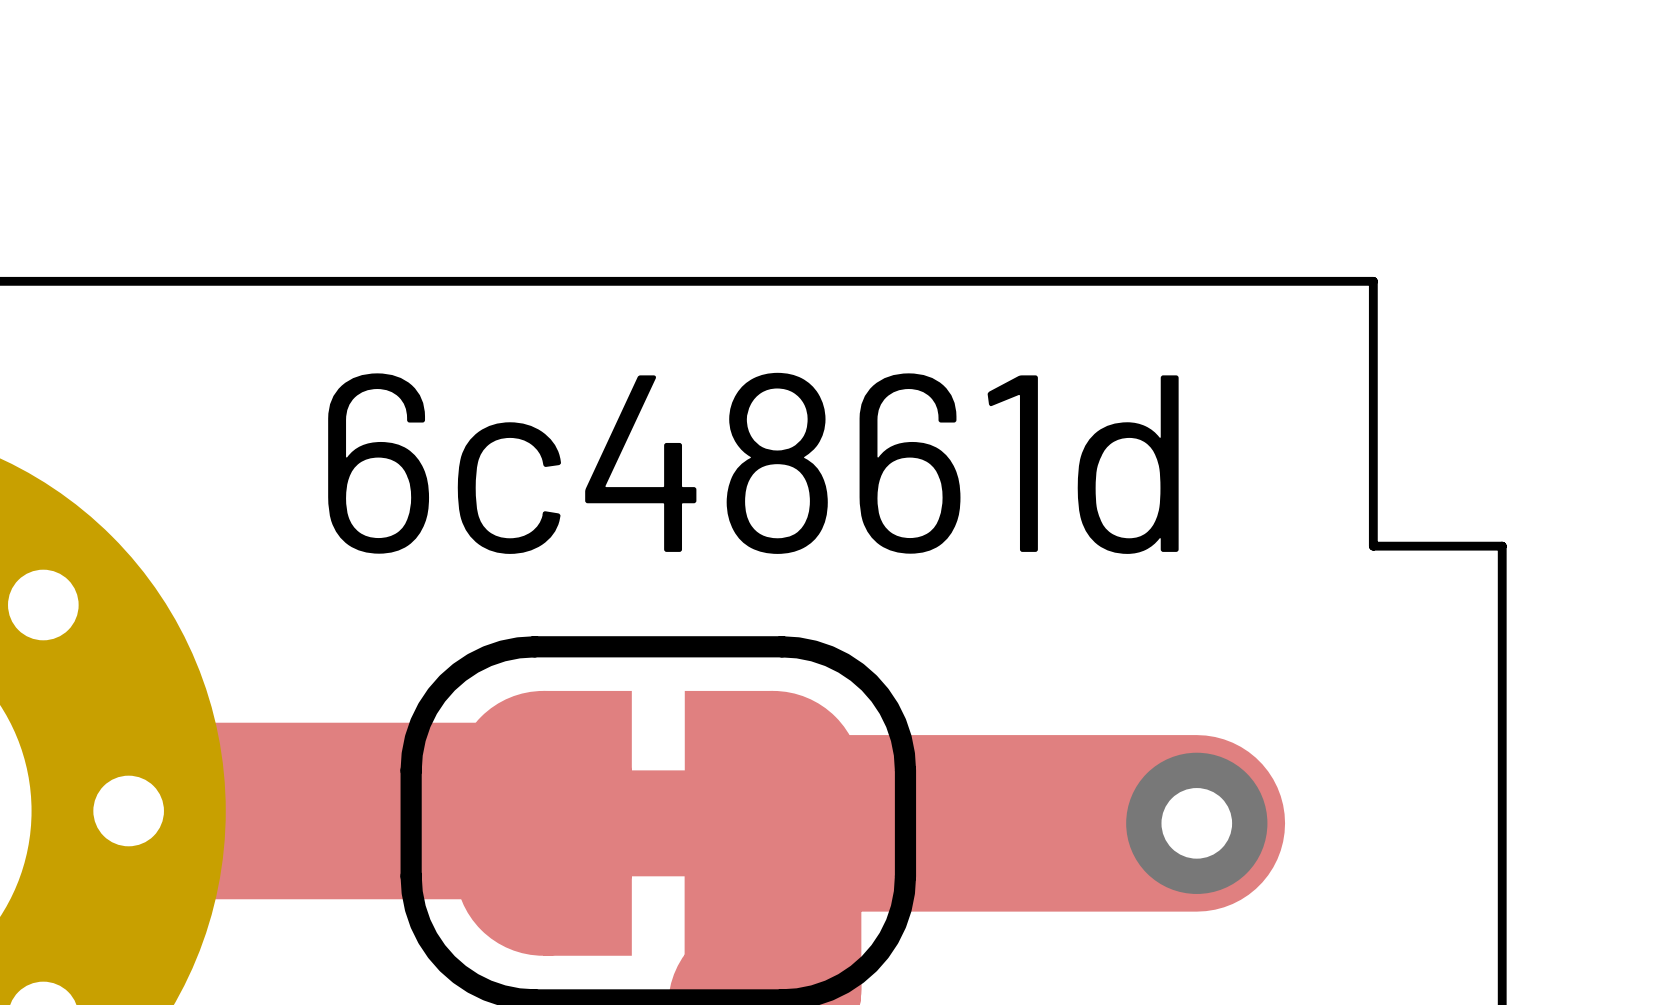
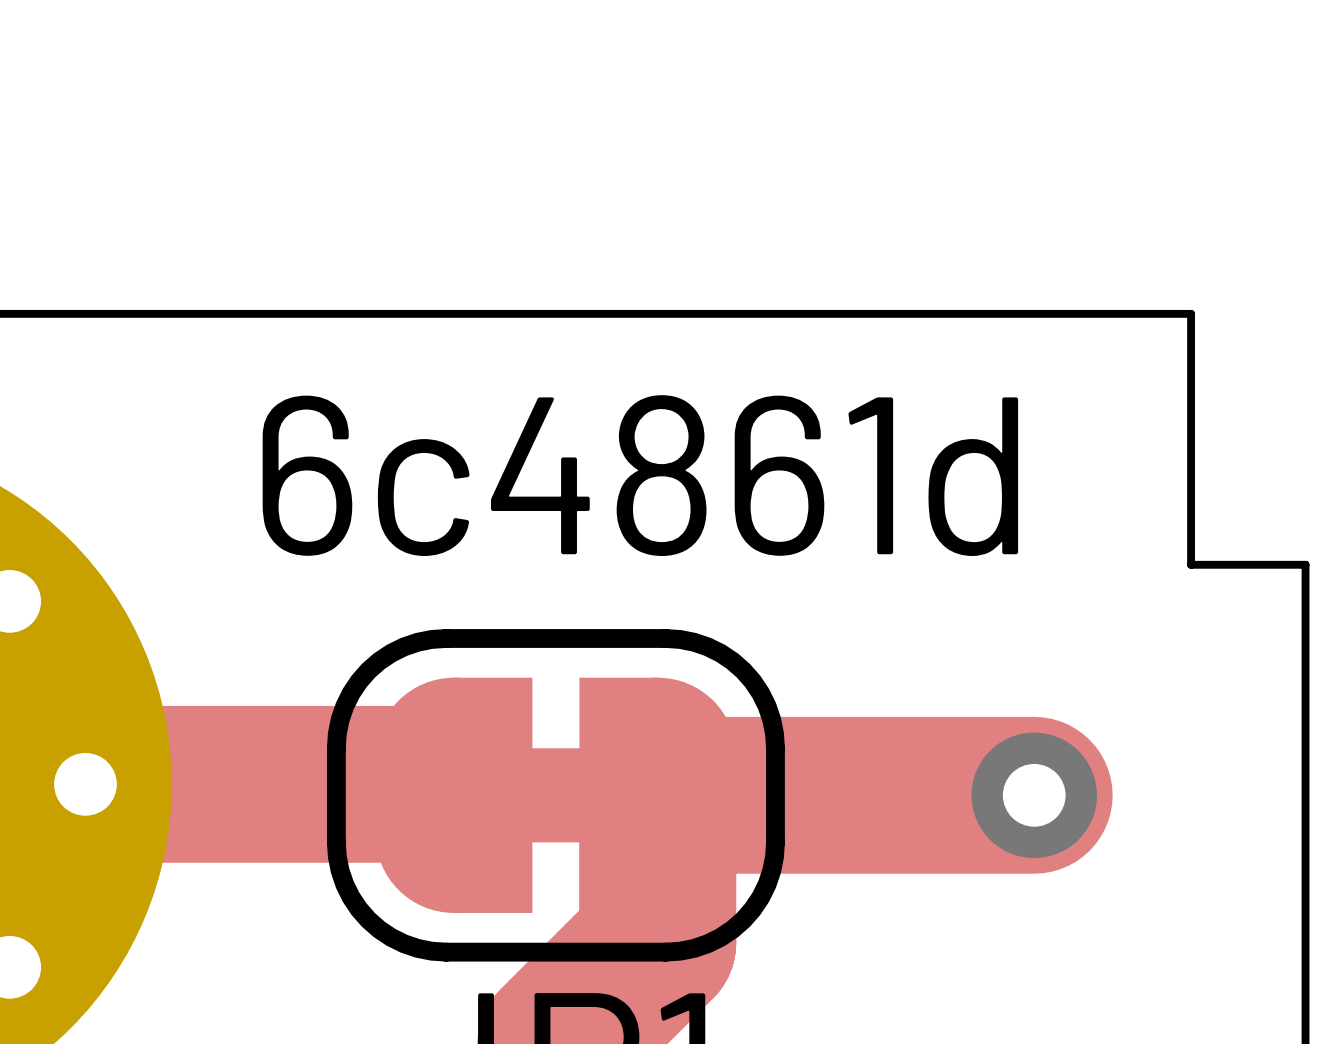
board edge: (1373, 546) (1502, 546) (1502, 563) -> (1191, 549) (1191, 564) (1305, 564)

